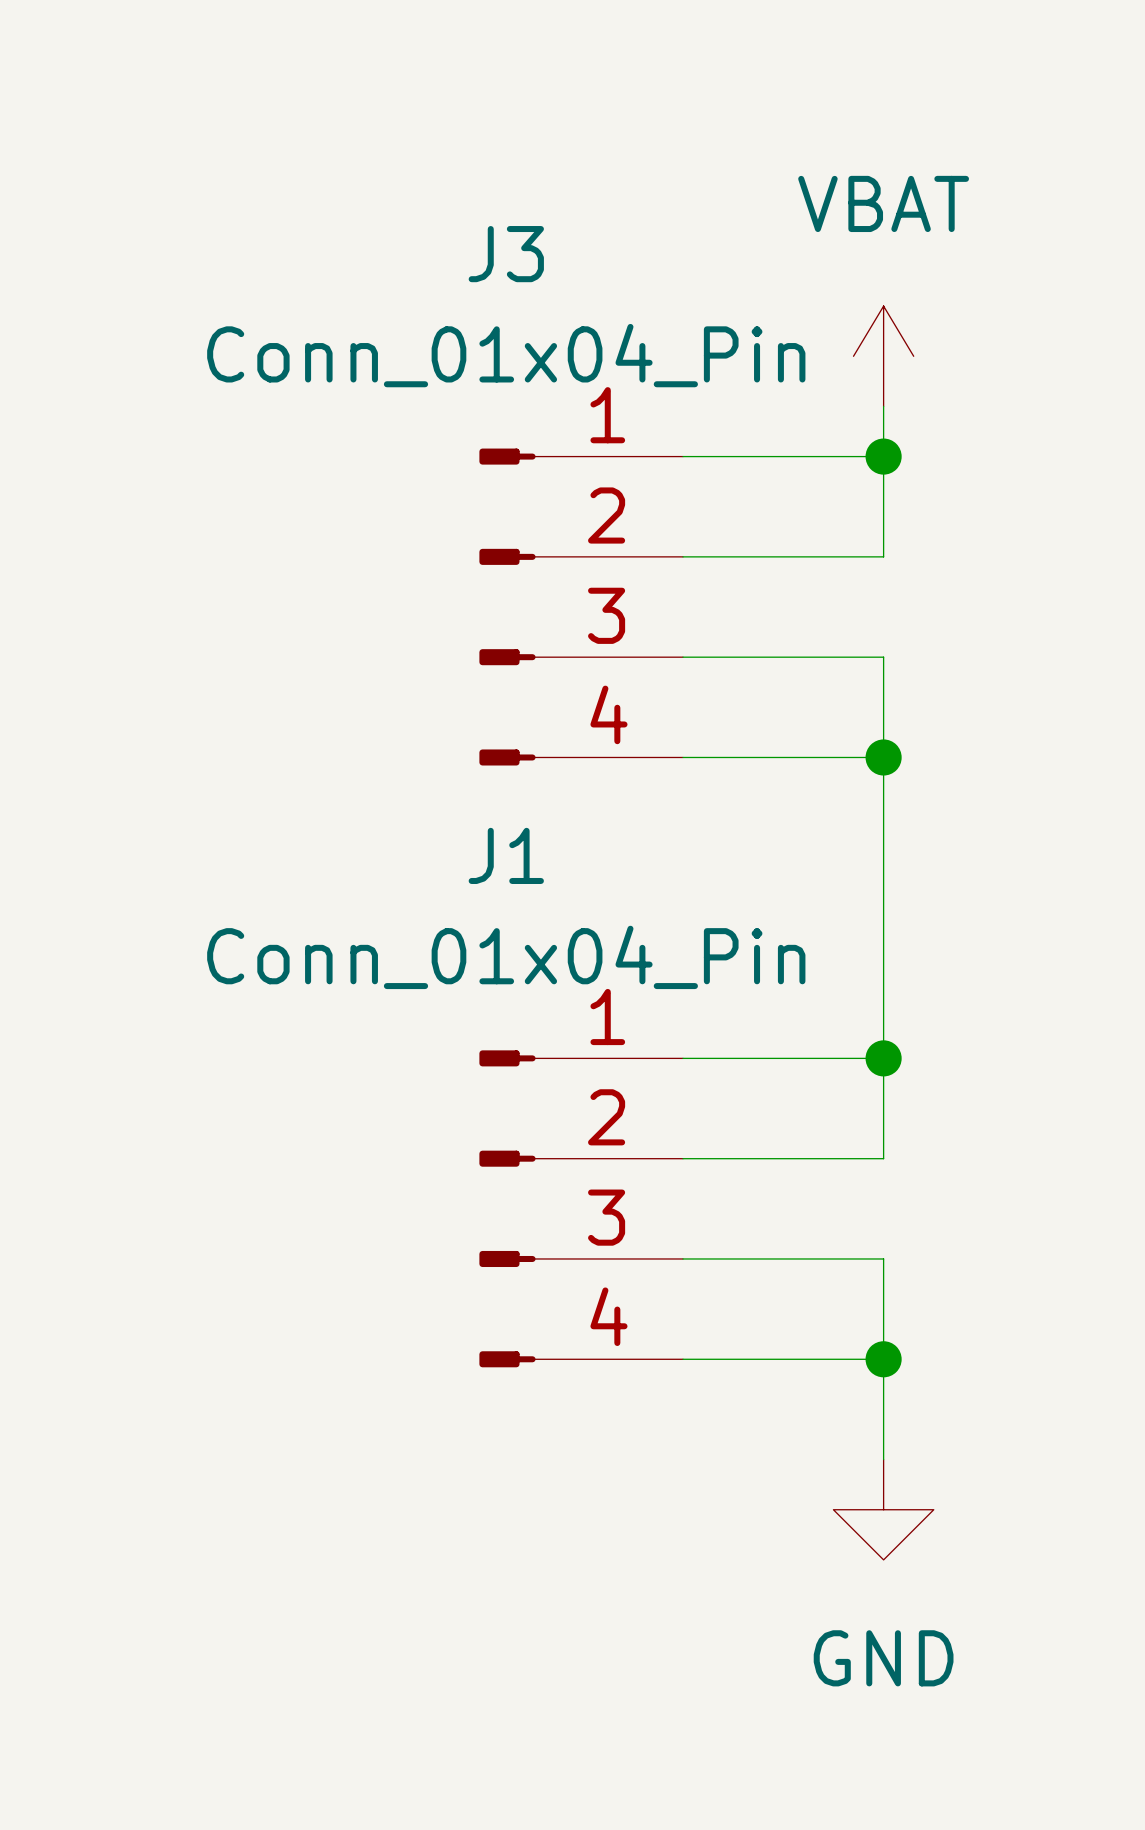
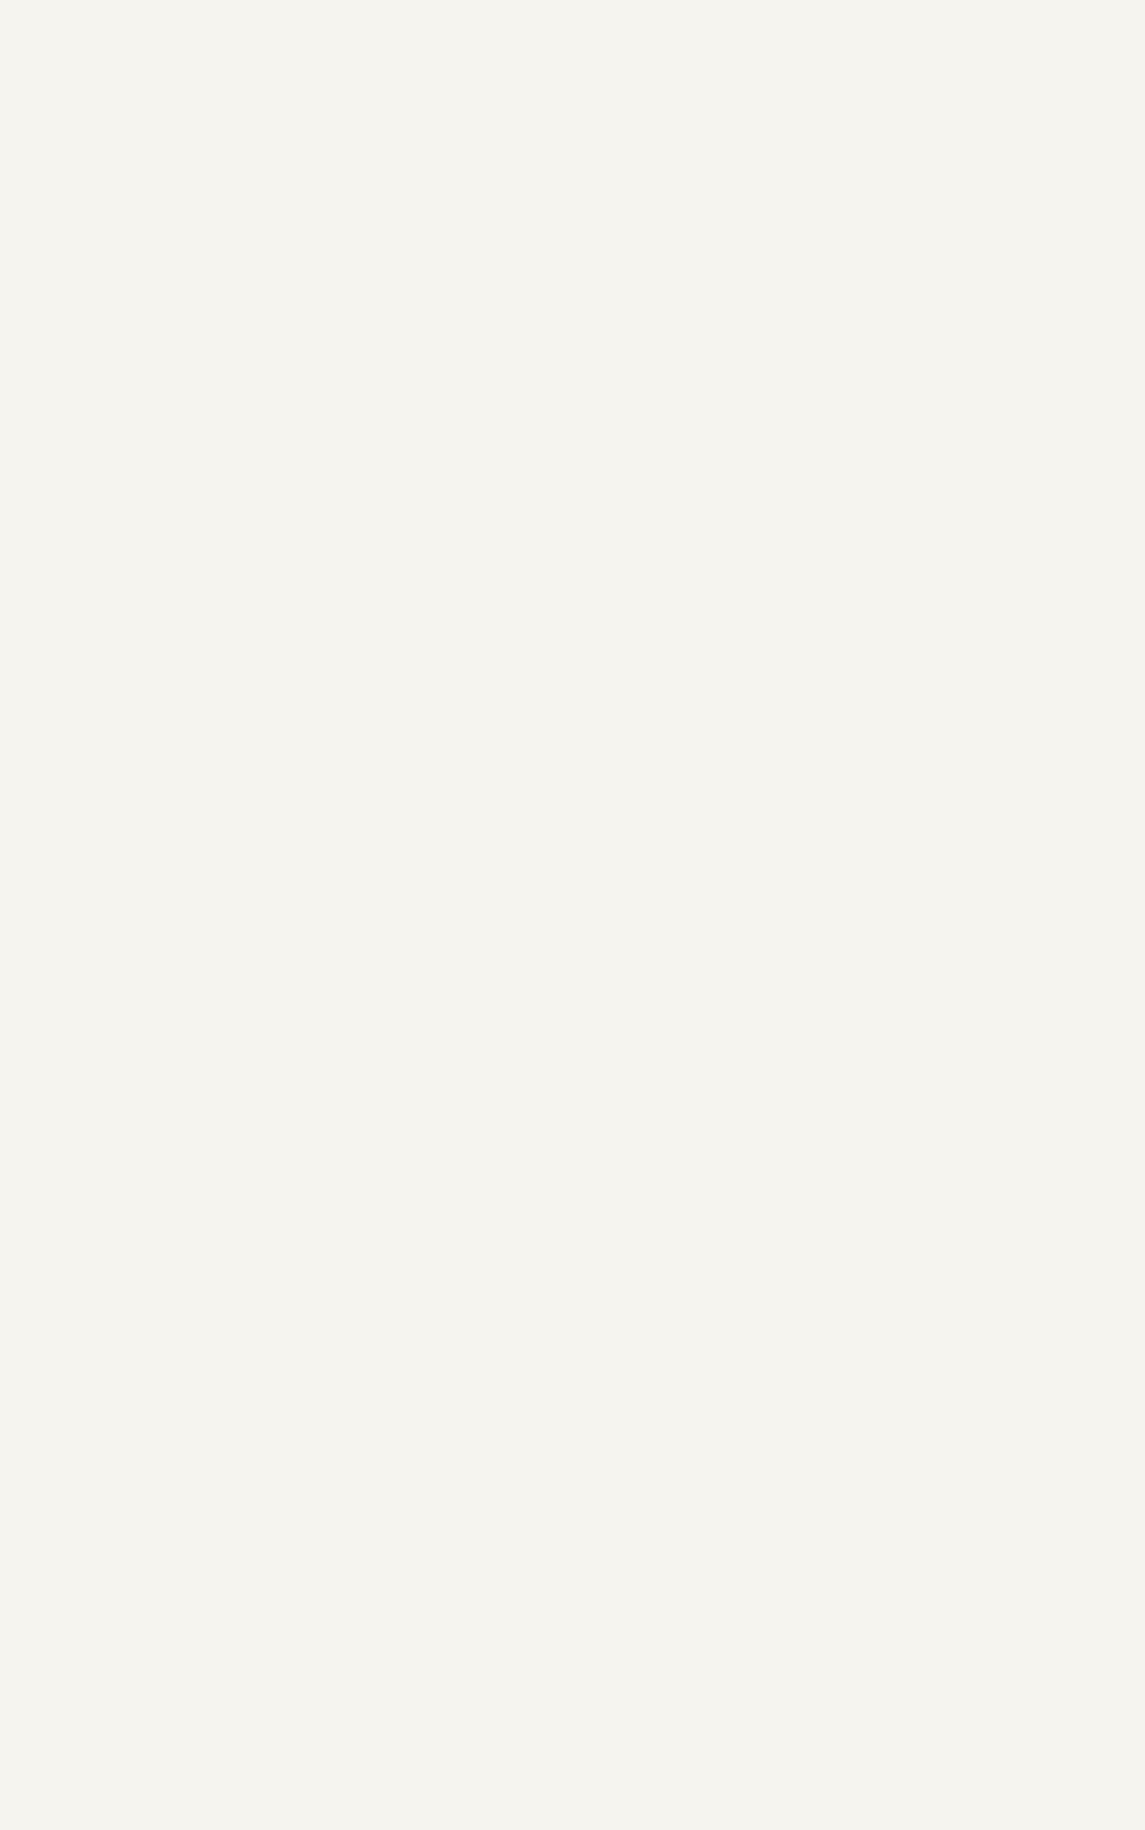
power symbol: VBAT (883, 356) -> none
wire: (883, 406) (883, 556) (683, 556) -> none
wire: (683, 456) (883, 456) -> none
junction: (883, 456) -> none
J3: Conn_01x04_Pin (581, 607) -> none
wire: (683, 657) (883, 657) (883, 1158) (683, 1158) -> none
wire: (683, 757) (883, 757) -> none
junction: (883, 757) -> none
wire: (683, 1058) (883, 1058) -> none
junction: (883, 1058) -> none
J1: Conn_01x04_Pin (581, 1208) -> none
wire: (683, 1258) (883, 1258) (883, 1459) -> none
wire: (683, 1359) (883, 1359) -> none
junction: (883, 1359) -> none
power symbol: GND (883, 1509) -> none

